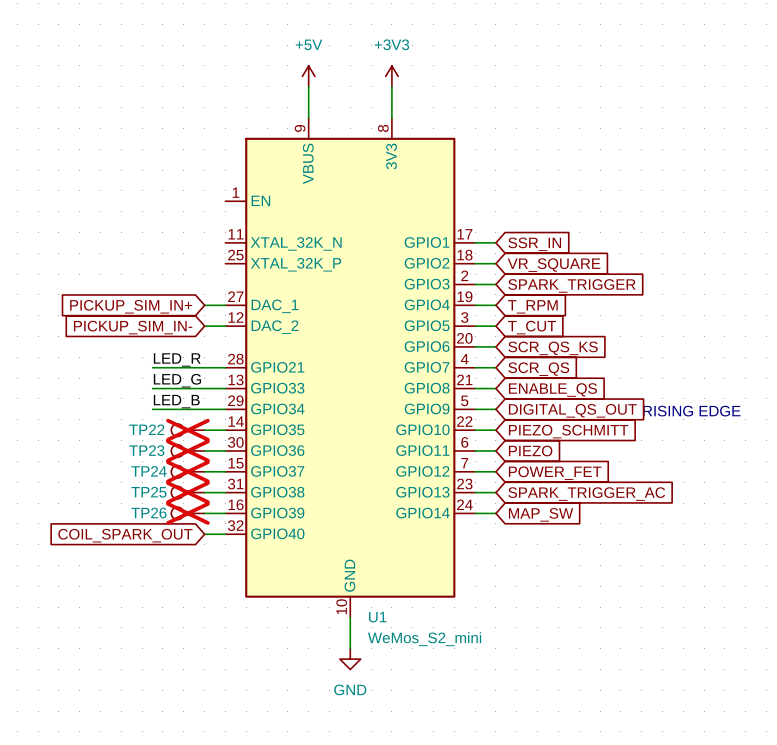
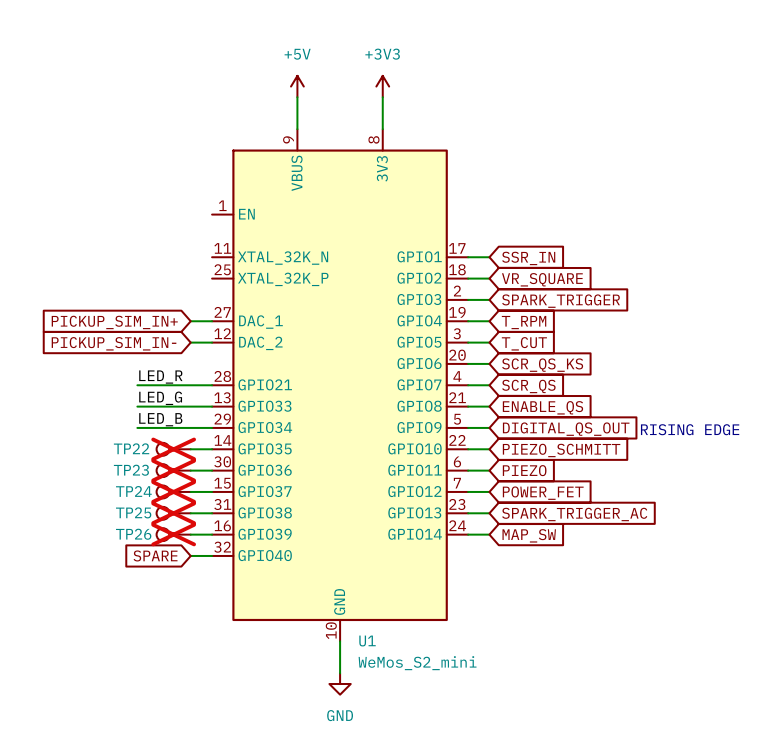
global label: COIL_SPARK_OUT (125, 535) -> SPARE (155, 555)

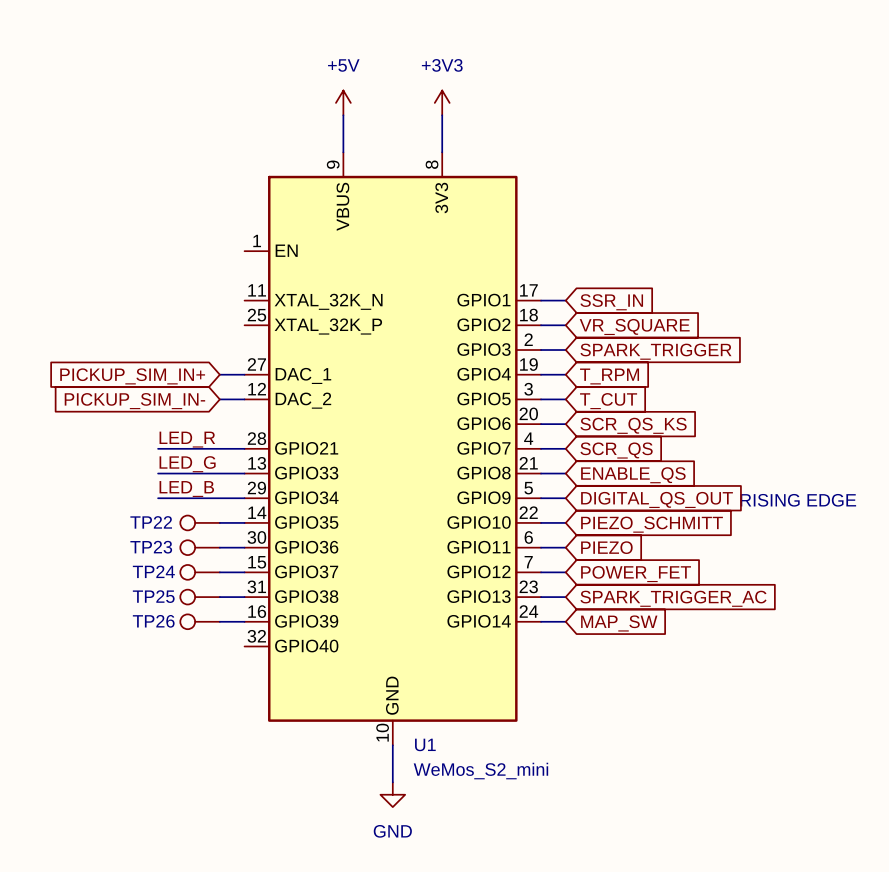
TP22 do-not-place cross: (173, 449) -> none
TP23 do-not-place cross: (173, 470) -> none
TP24 do-not-place cross: (173, 491) -> none
TP25 do-not-place cross: (173, 513) -> none
TP26 do-not-place cross: (173, 534) -> none
global label: SPARE (155, 555) -> none
wire: (190, 555) (212, 555) -> none

